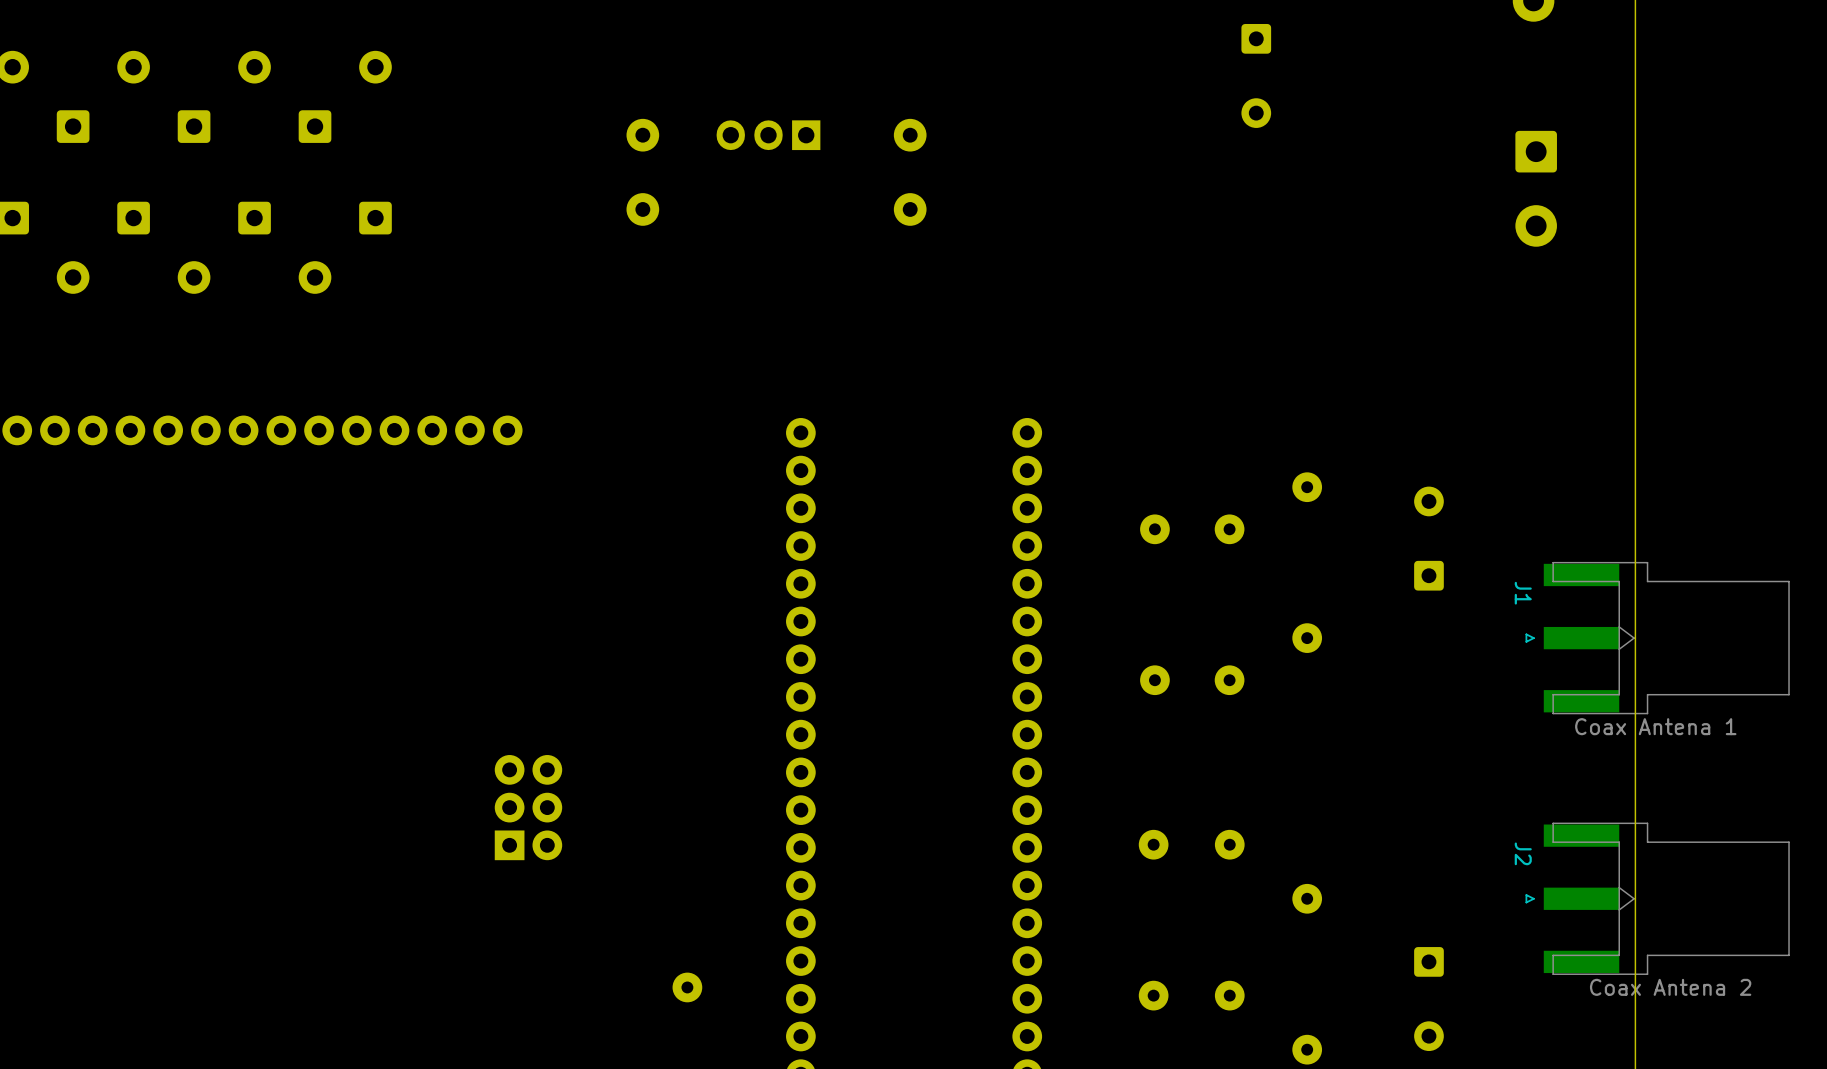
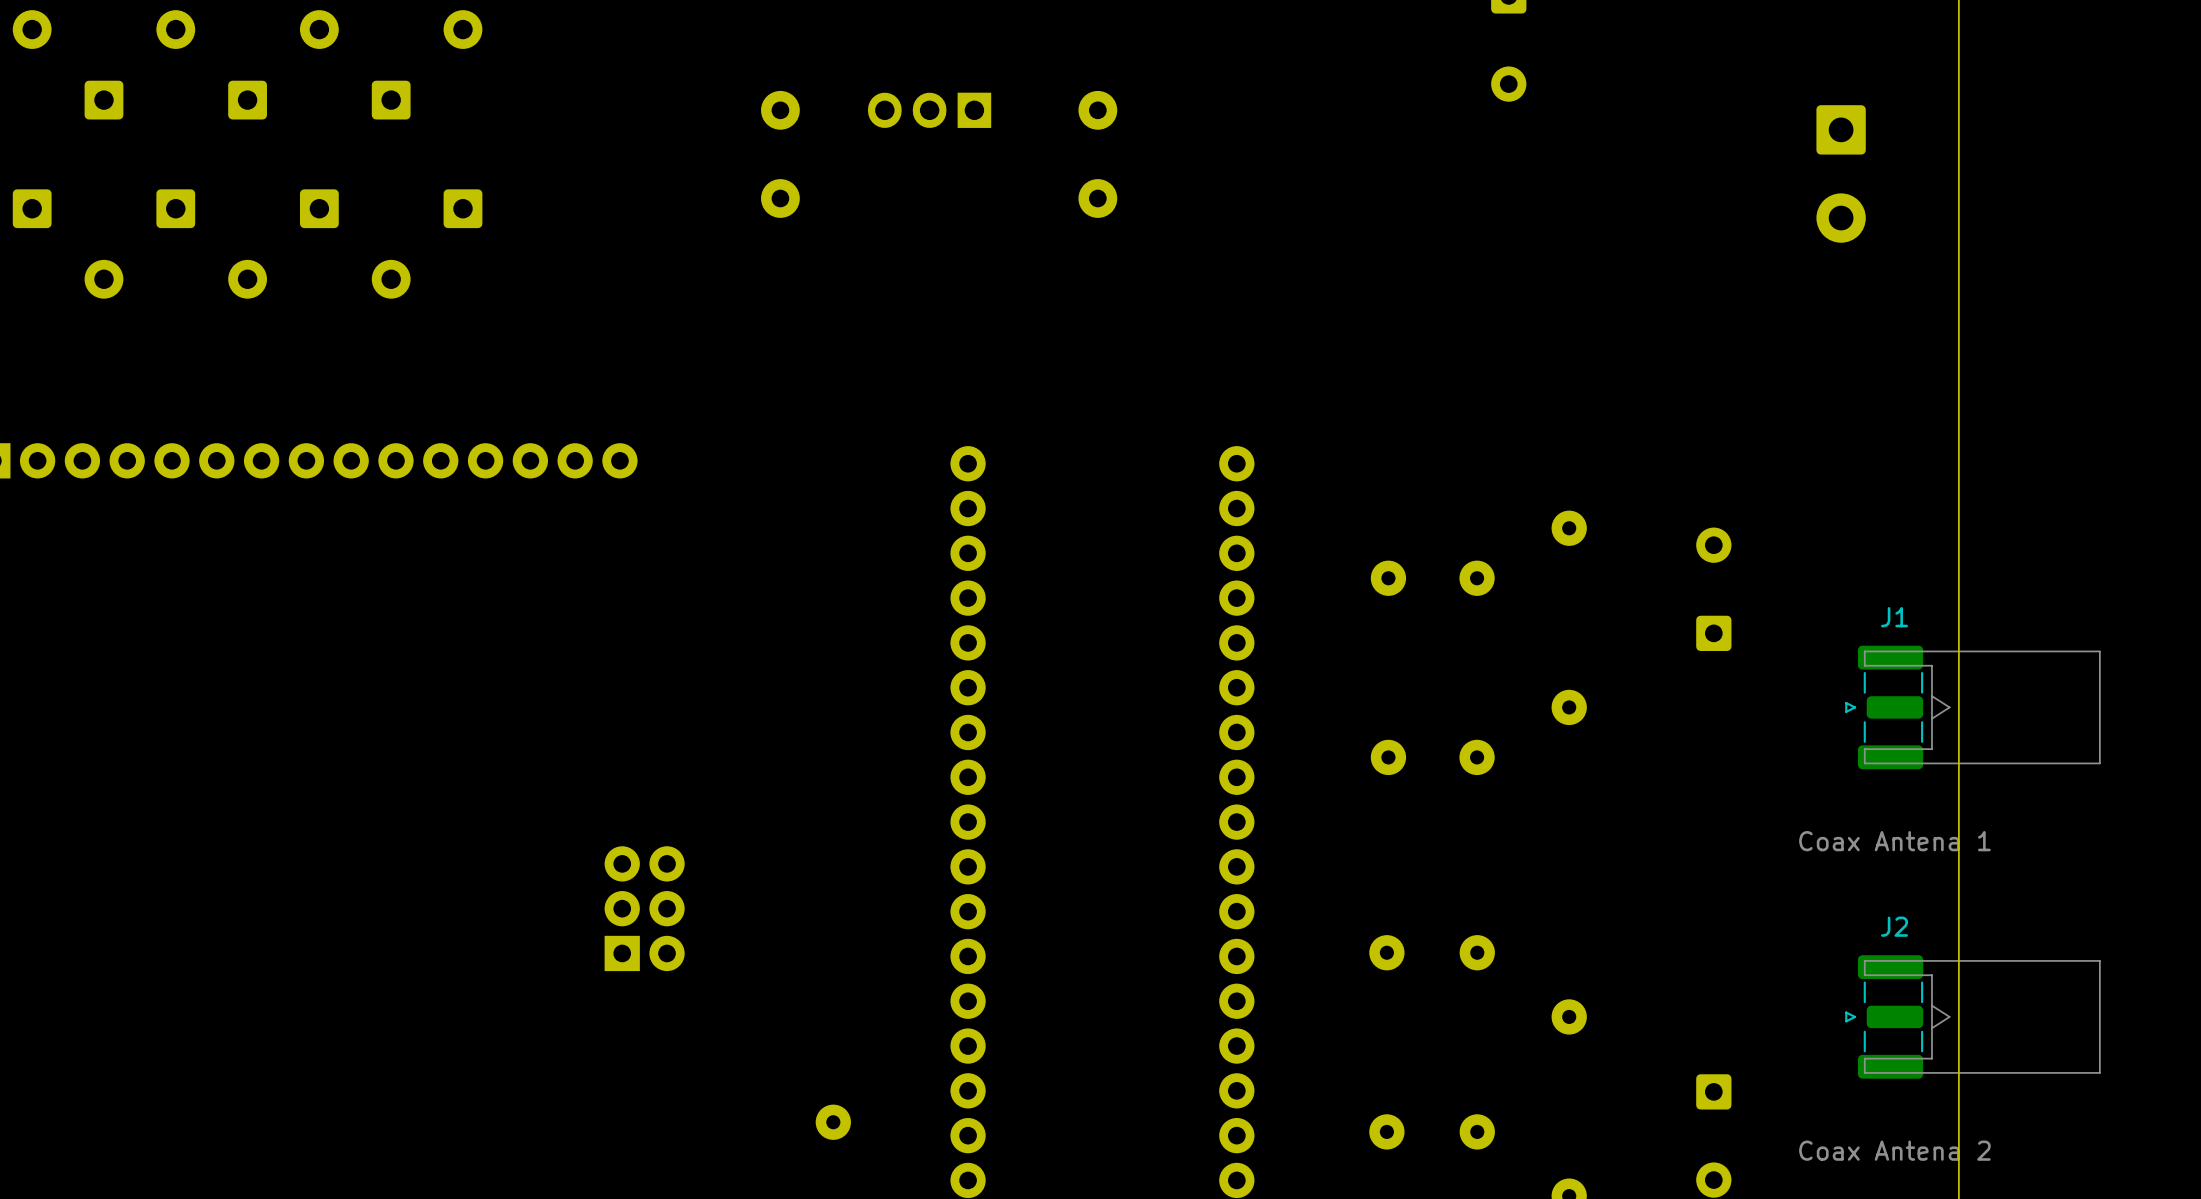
J1 footprint: [1525, 561, 1790, 715] -> [1845, 645, 2101, 770]
J1 name position: J1 (1523, 593) -> J1 (1894, 617)
J1 value position: Coax Antena 1 (1655, 726) -> Coax Antena 1 (1894, 841)
J2 footprint: [1525, 822, 1790, 975] -> [1845, 955, 2101, 1079]
J2 name position: J2 (1523, 853) -> J2 (1894, 926)
J2 value position: Coax Antena 2 (1670, 987) -> Coax Antena 2 (1894, 1150)

